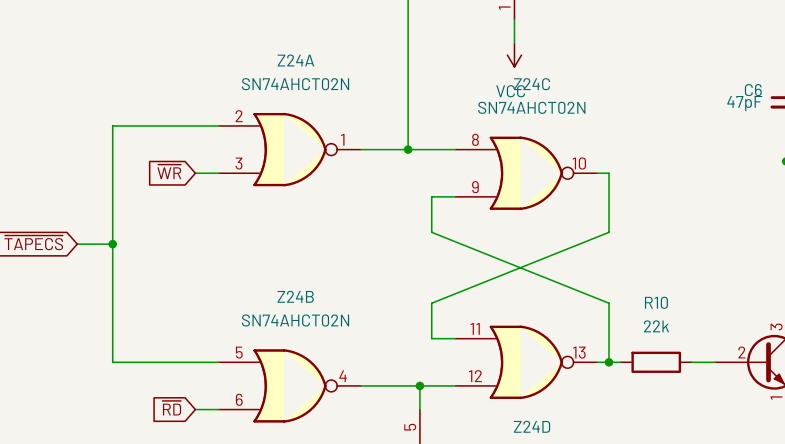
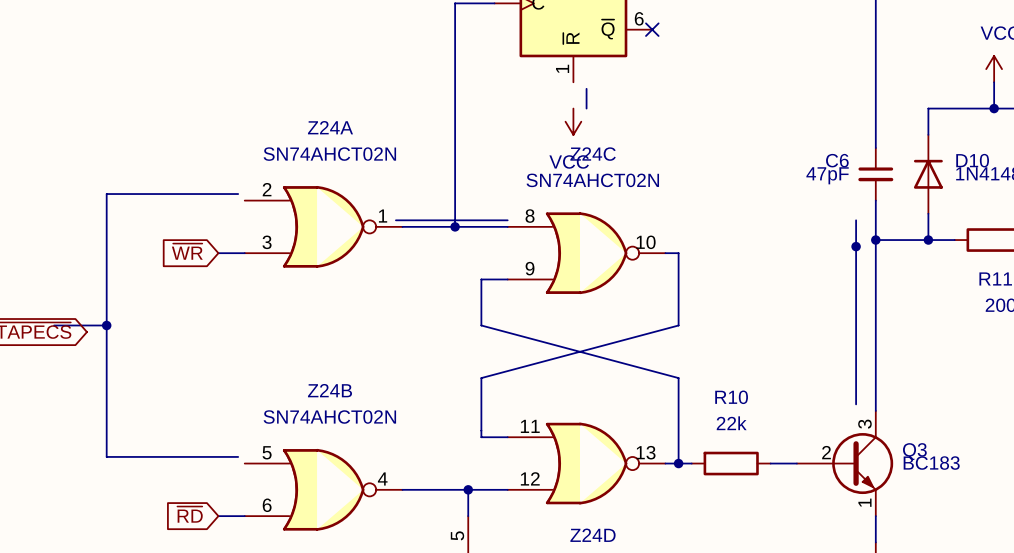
wire: (514, 19) (514, 43) -> none
wire: none -> (586, 88) (586, 108)
wire: none -> (238, 194) (106, 194) (106, 456) (238, 456)
wire: (219, 125) (112, 125) (112, 362) (219, 362) -> none
wire: none -> (395, 220) (507, 220)
wire: none -> (856, 220) (856, 404)
junction: none -> (856, 246)
wire: (431, 232) (608, 303) -> (481, 318) (481, 325) (678, 378) (678, 397)
wire: (608, 232) (431, 303) -> (678, 318) (678, 325) (481, 378) (481, 397)
wire: none -> (54, 325) (106, 325)
wire: (77, 244) (112, 244) -> none
junction position: (112, 244) -> (106, 325)

